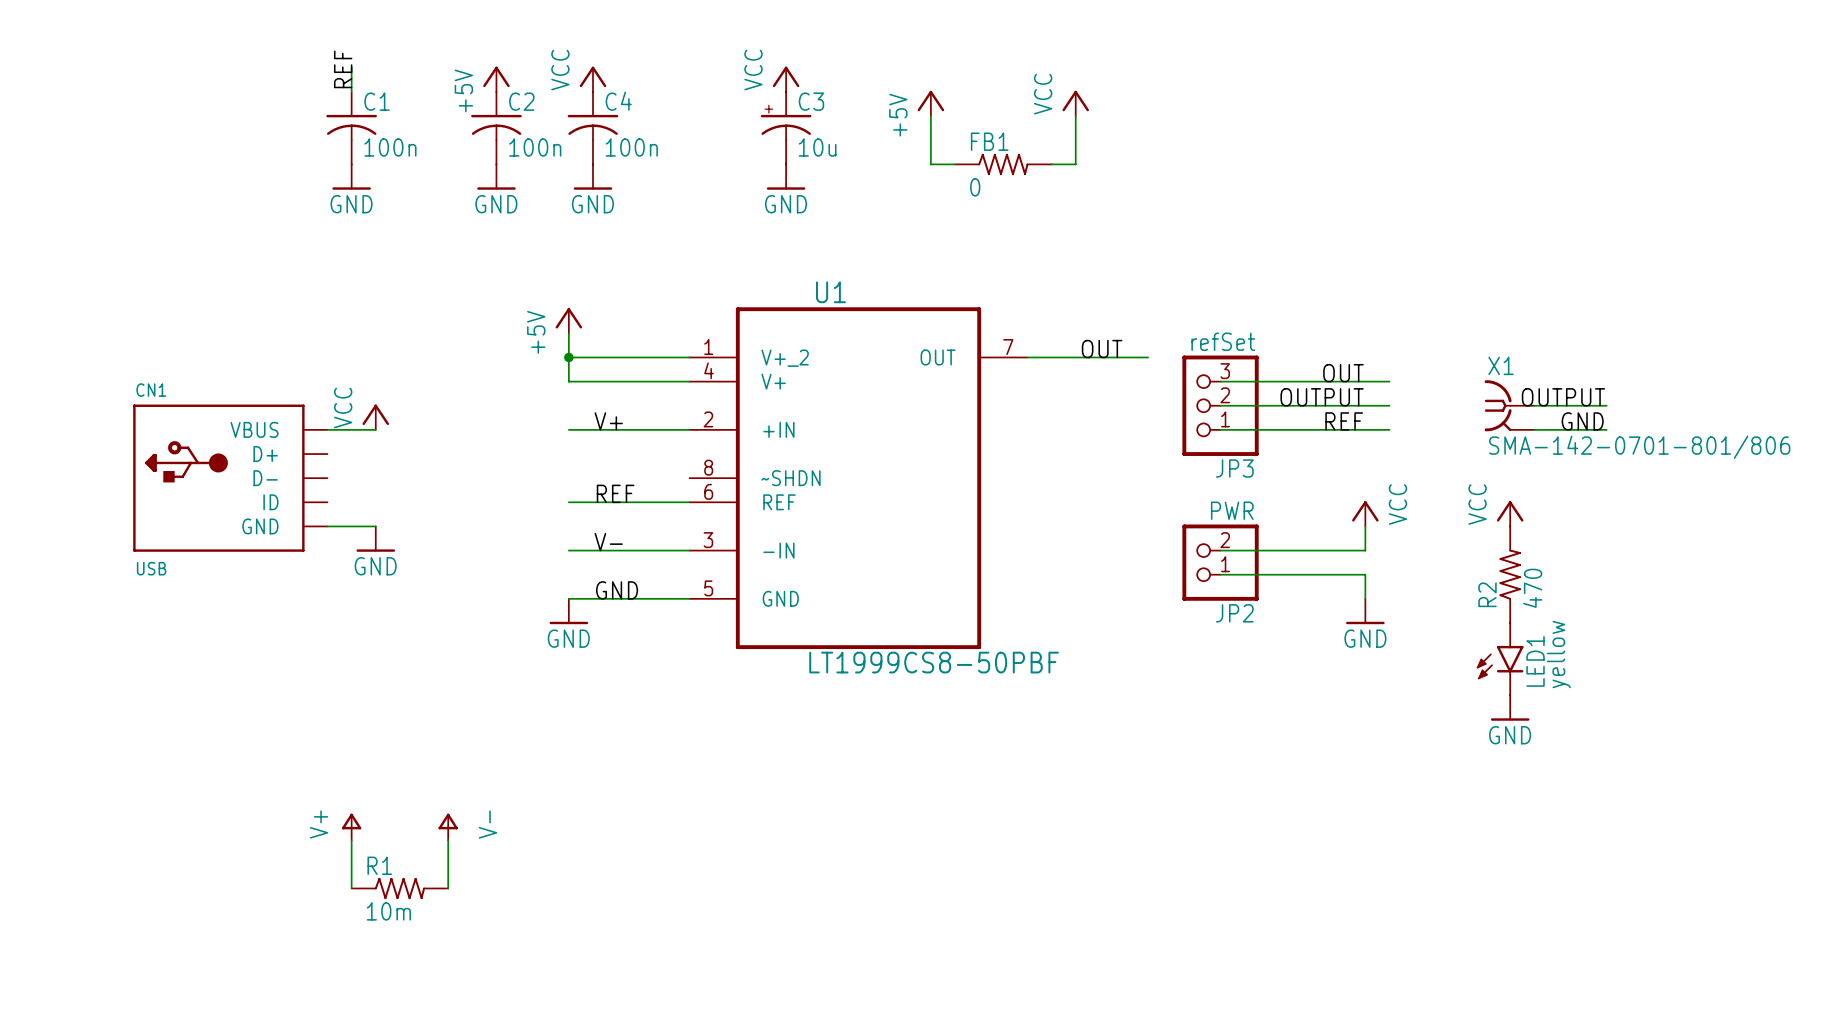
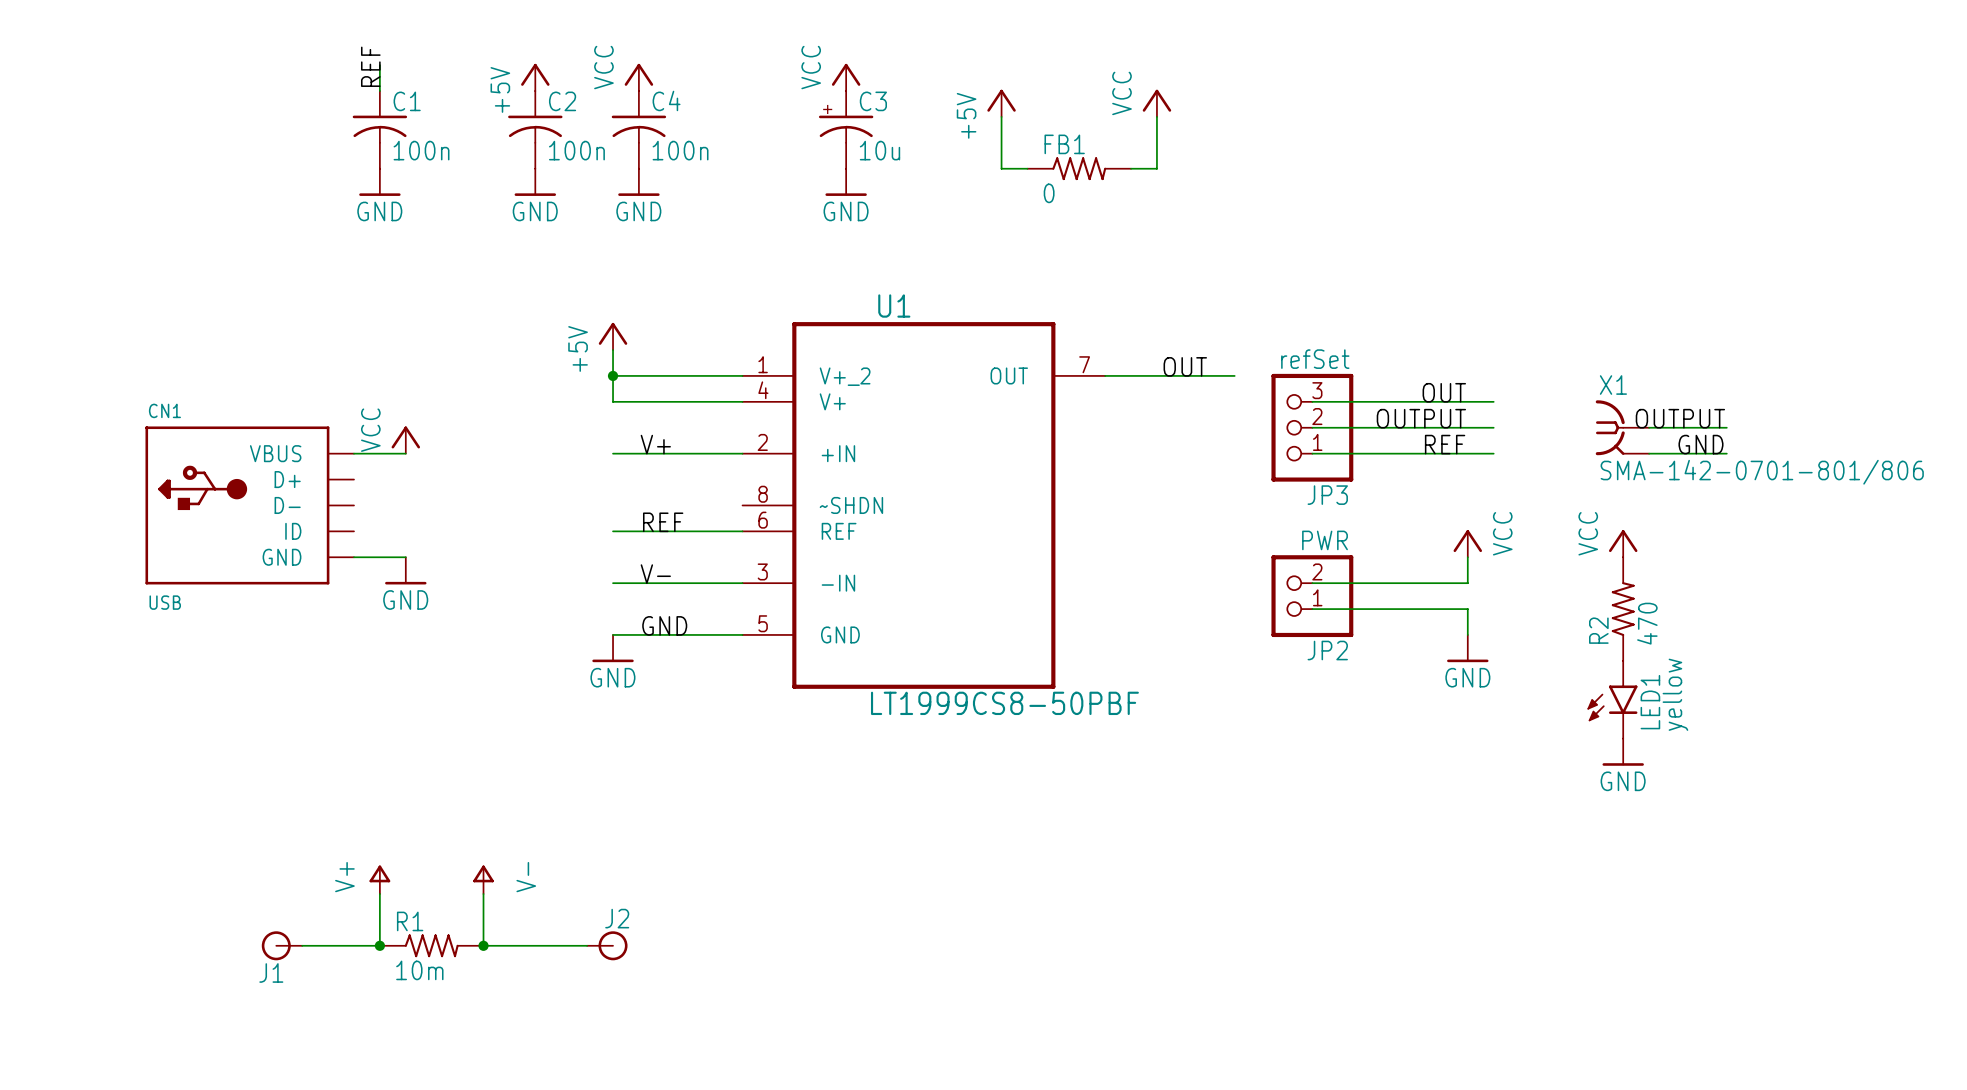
J1: none -> (281, 945)
wire: none -> (302, 945) (379, 945)
junction: none -> (379, 945)
wire: none -> (483, 945) (587, 945)
junction: none -> (483, 945)
J2: none -> (607, 945)

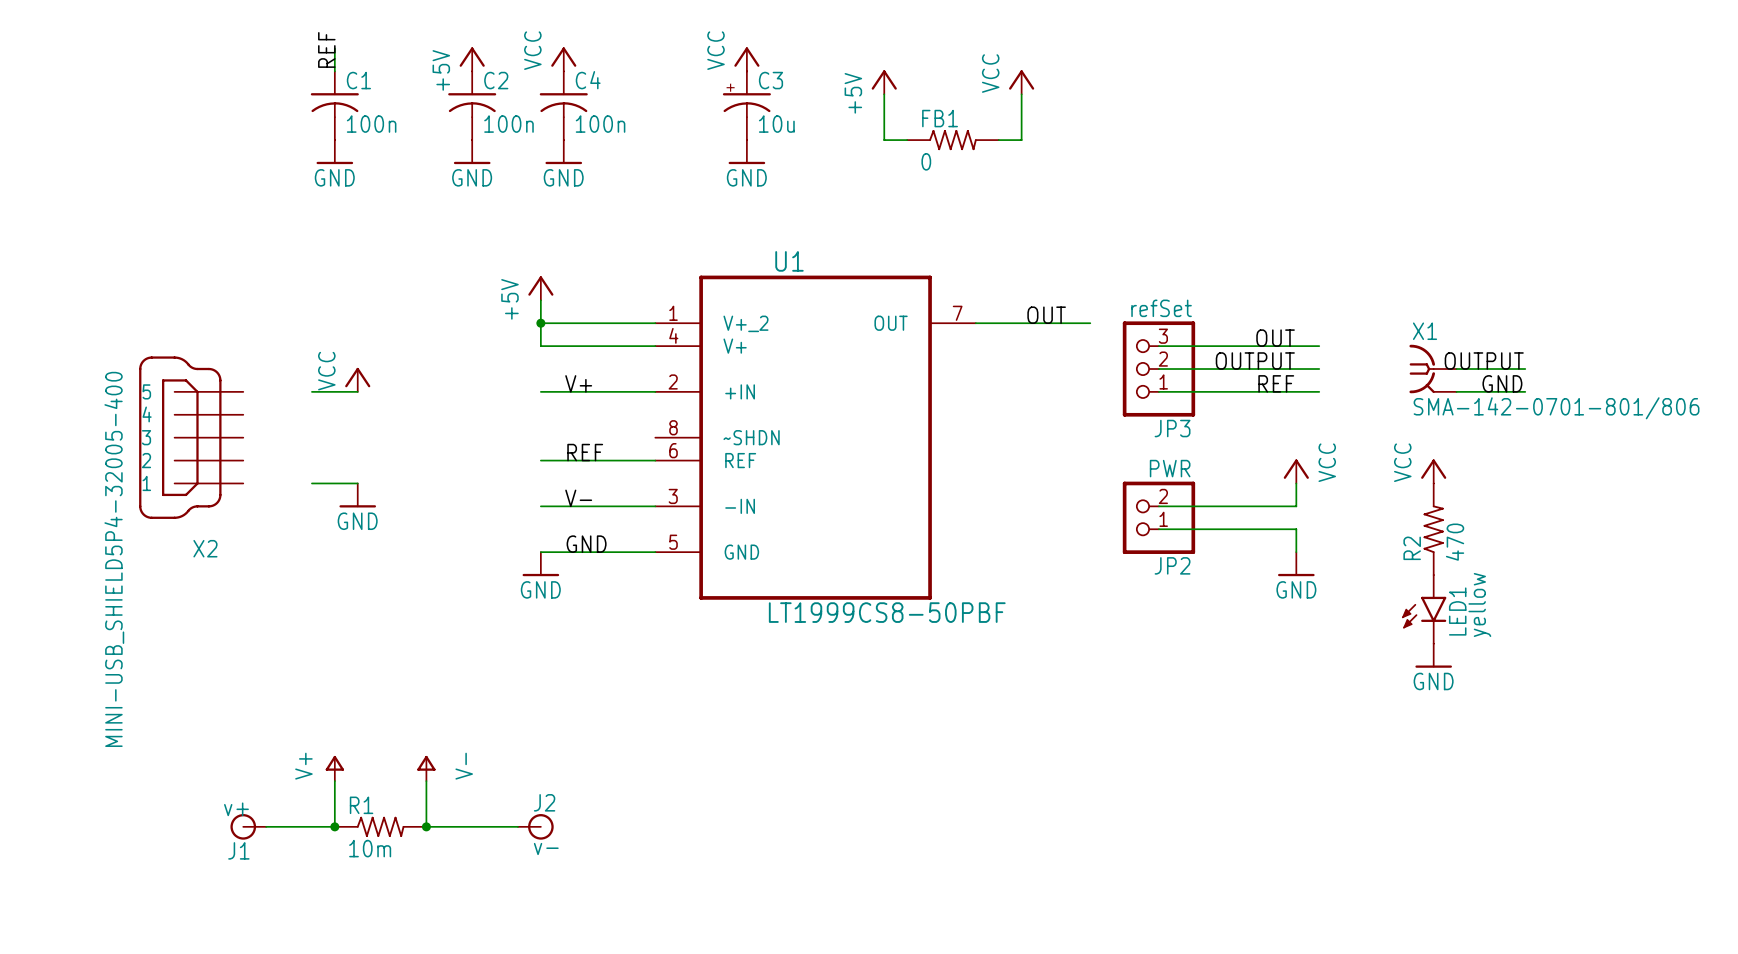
X2: none -> MINI-USB_SHIELD5P4-32005-400 (191, 437)
CN1: USB (249, 505) -> none
J1 value: none -> v+ (236, 809)
J2 value: none -> v- (546, 848)

